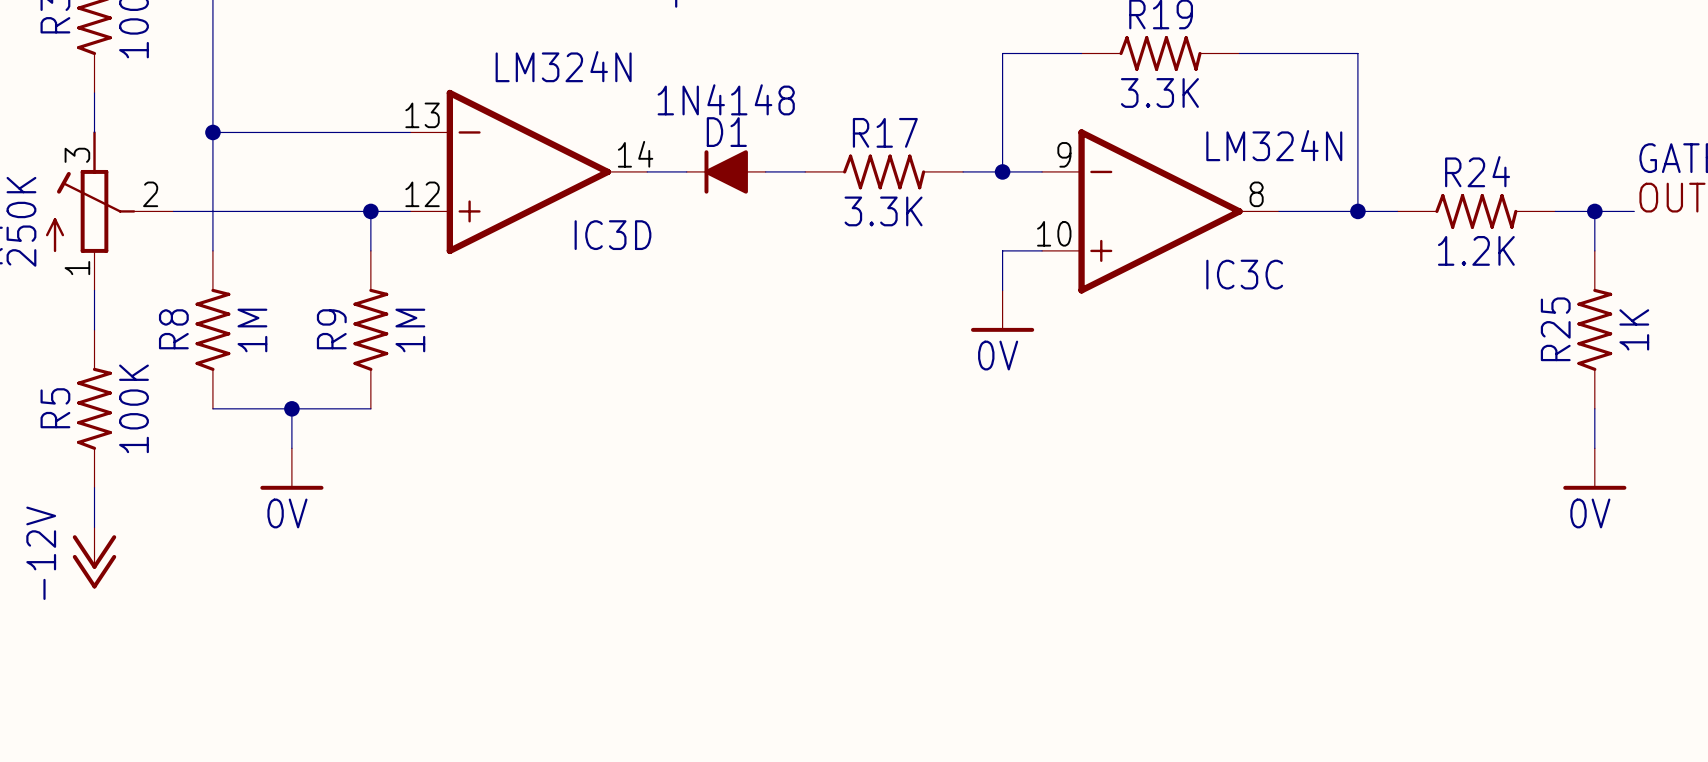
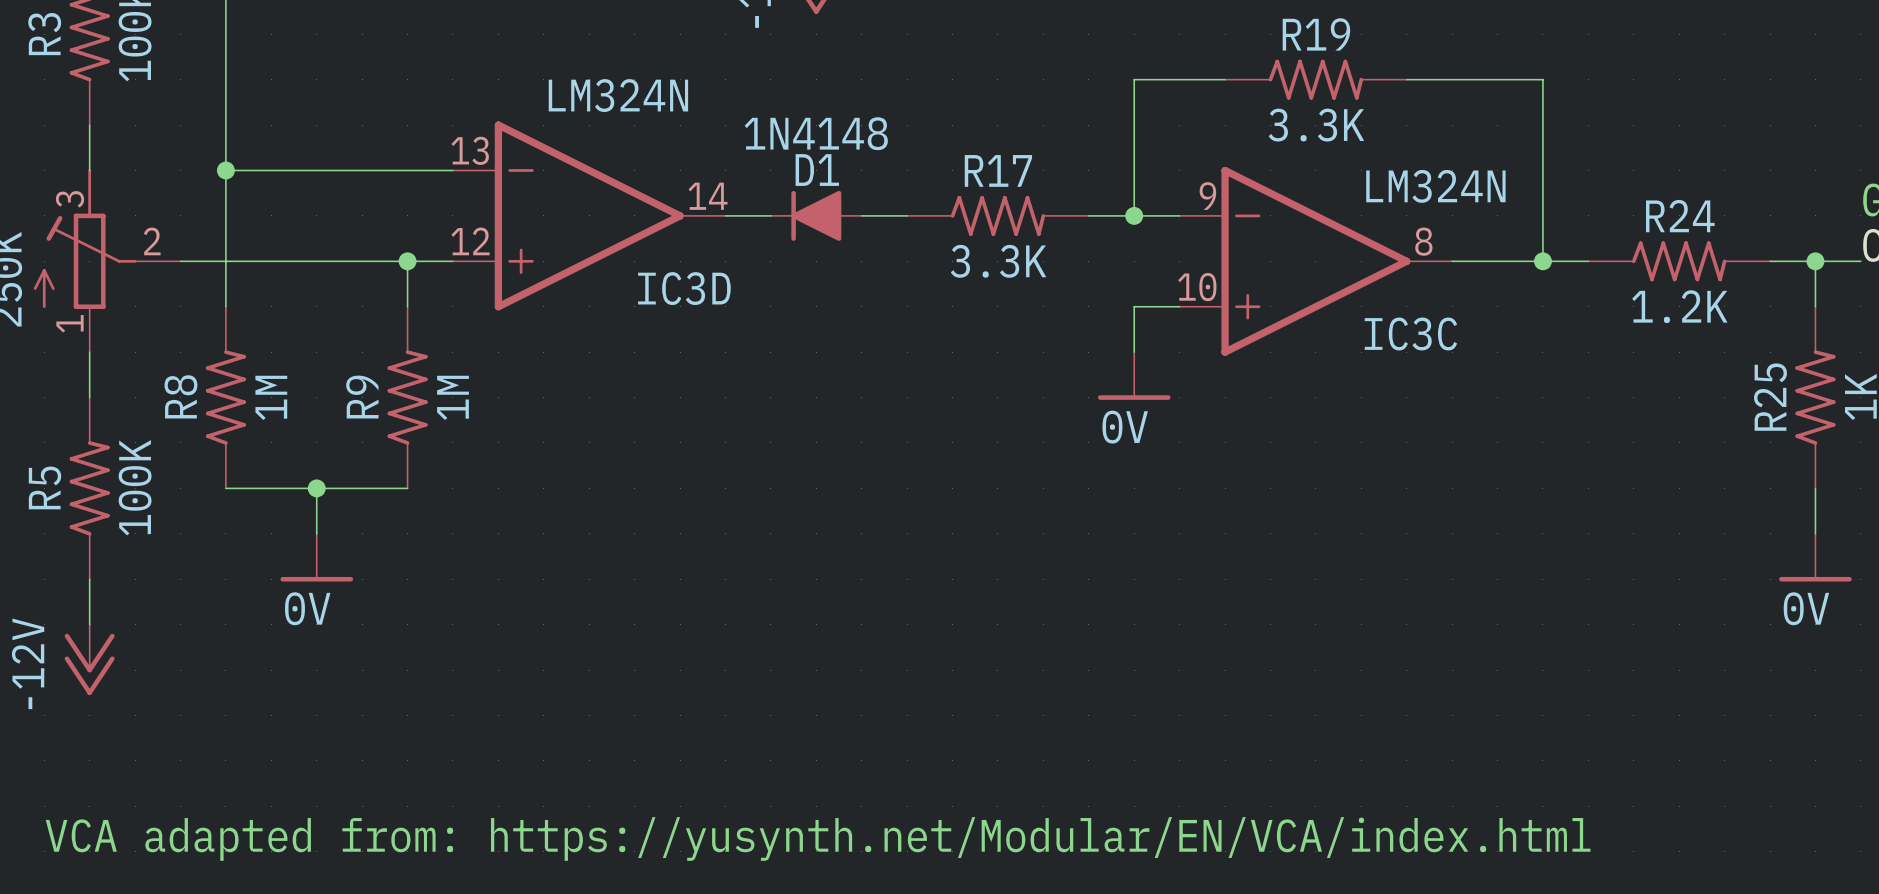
text: none -> VCA adapted from: https://yusynth.net/Modular/EN/VCA/index.html (818, 838)

